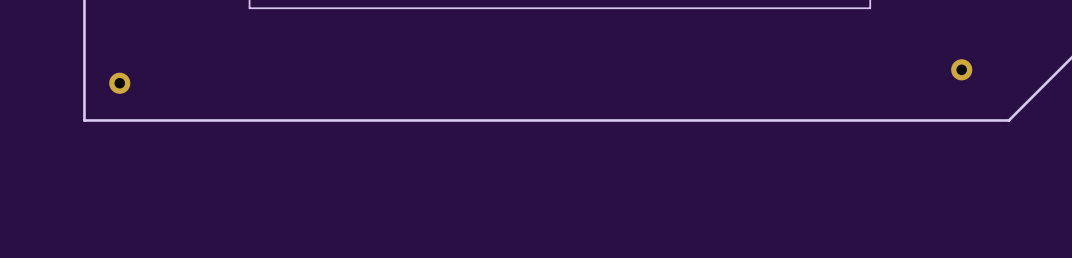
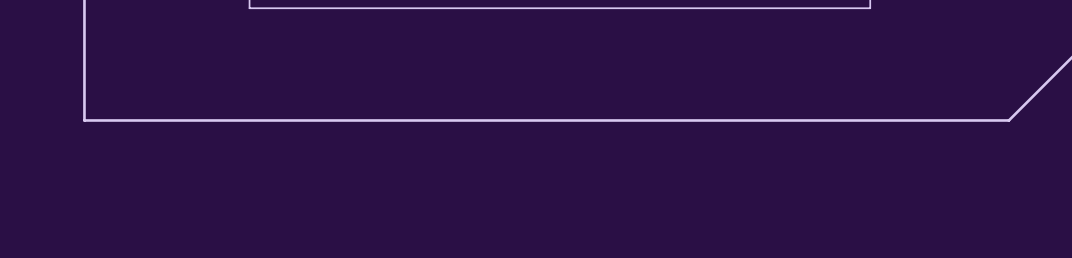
via: (961, 69) -> none
via: (119, 83) -> none

